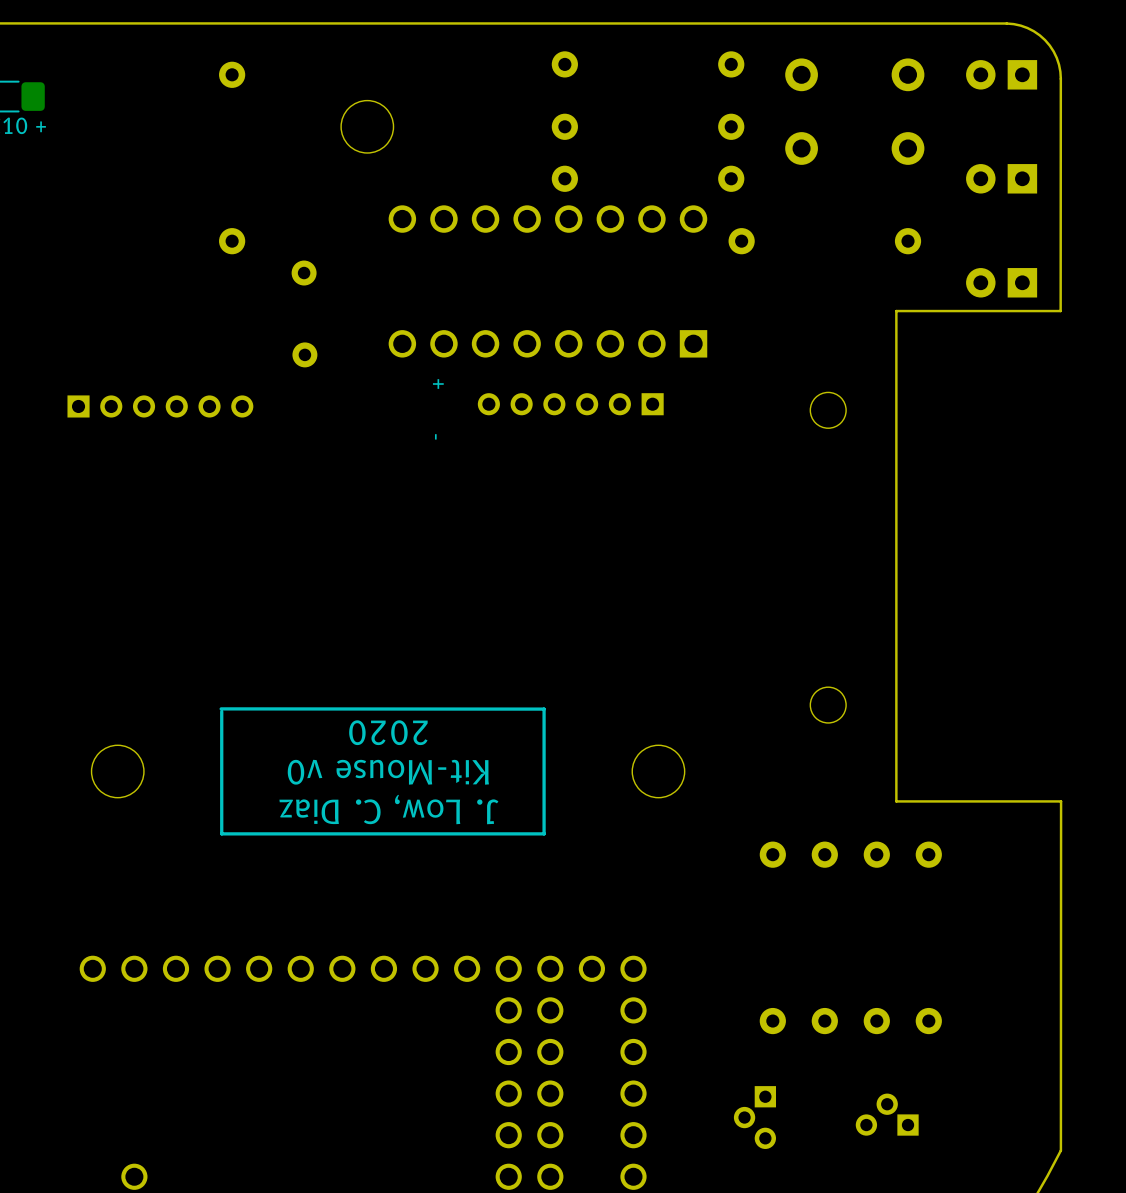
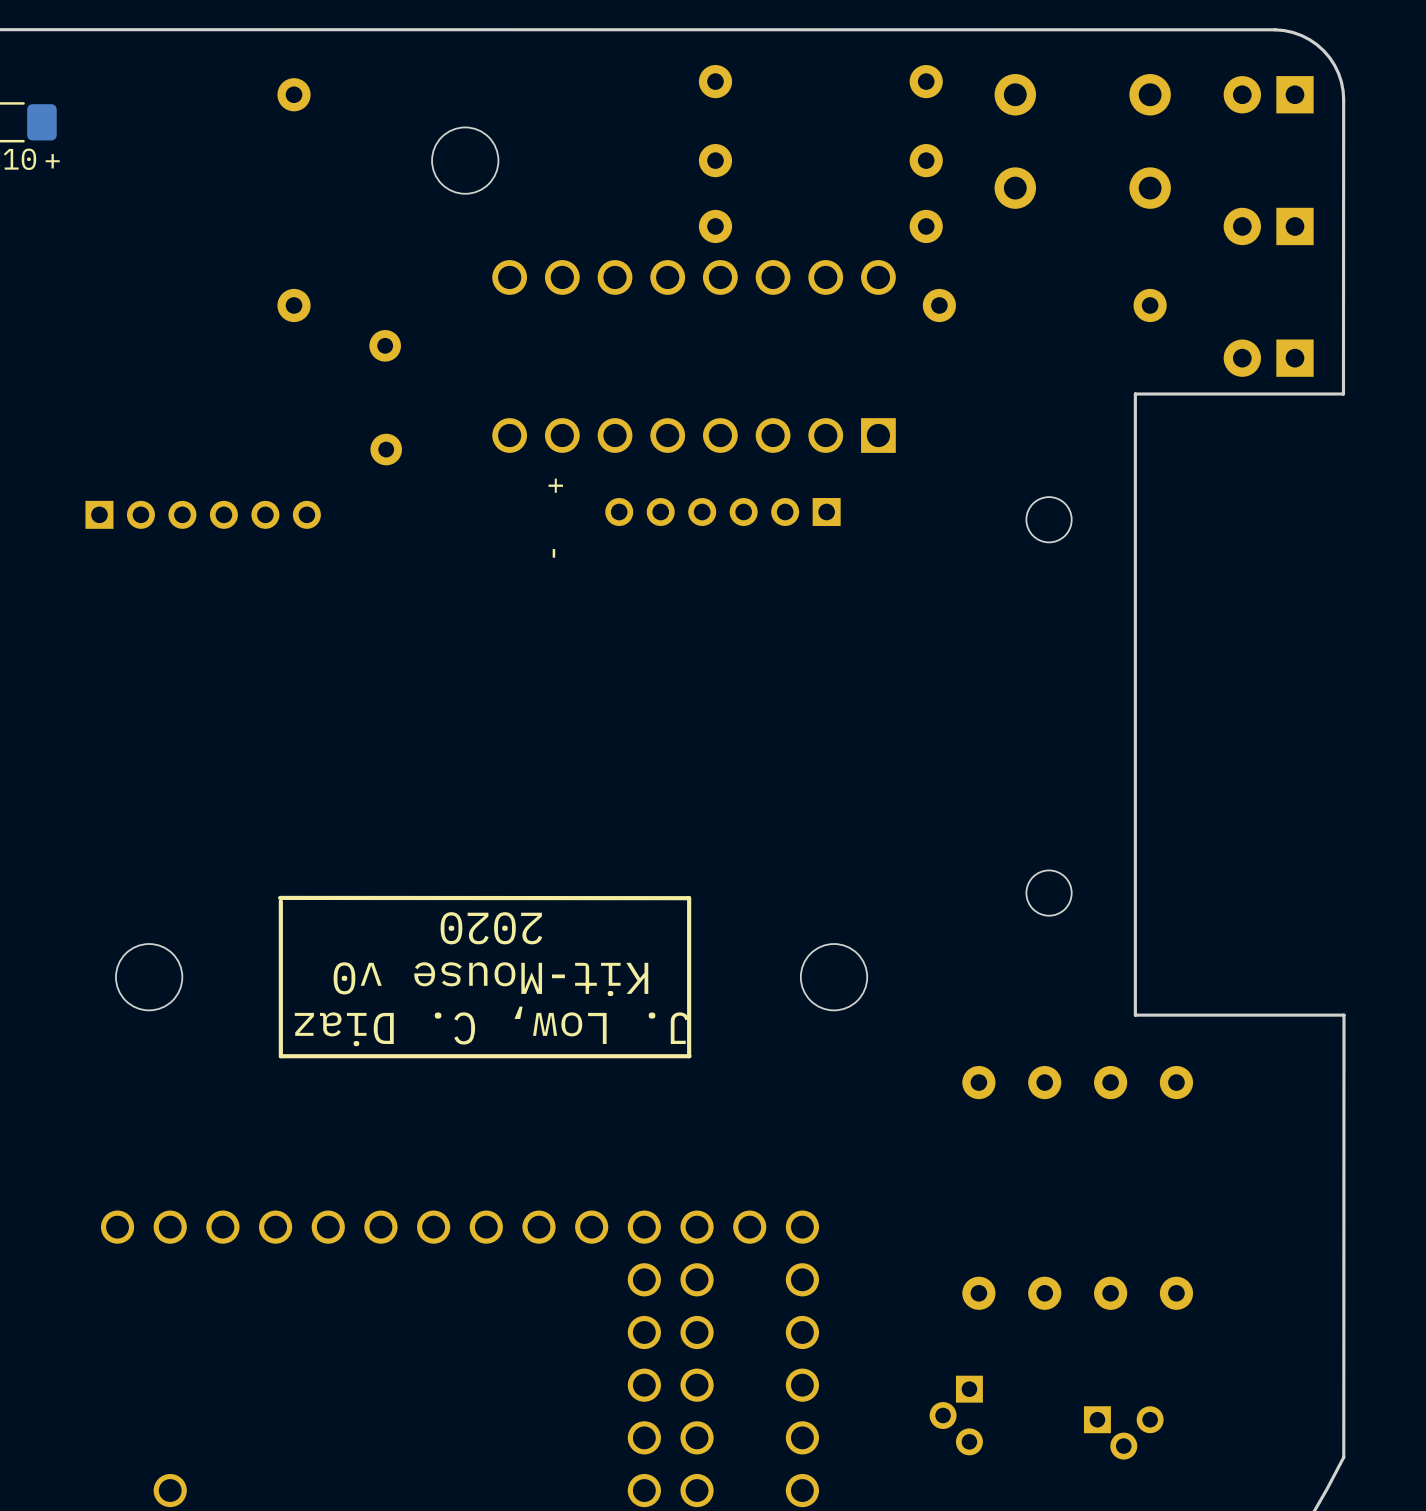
part rotation: 0° (887, 1114) -> 180° (1123, 1432)

